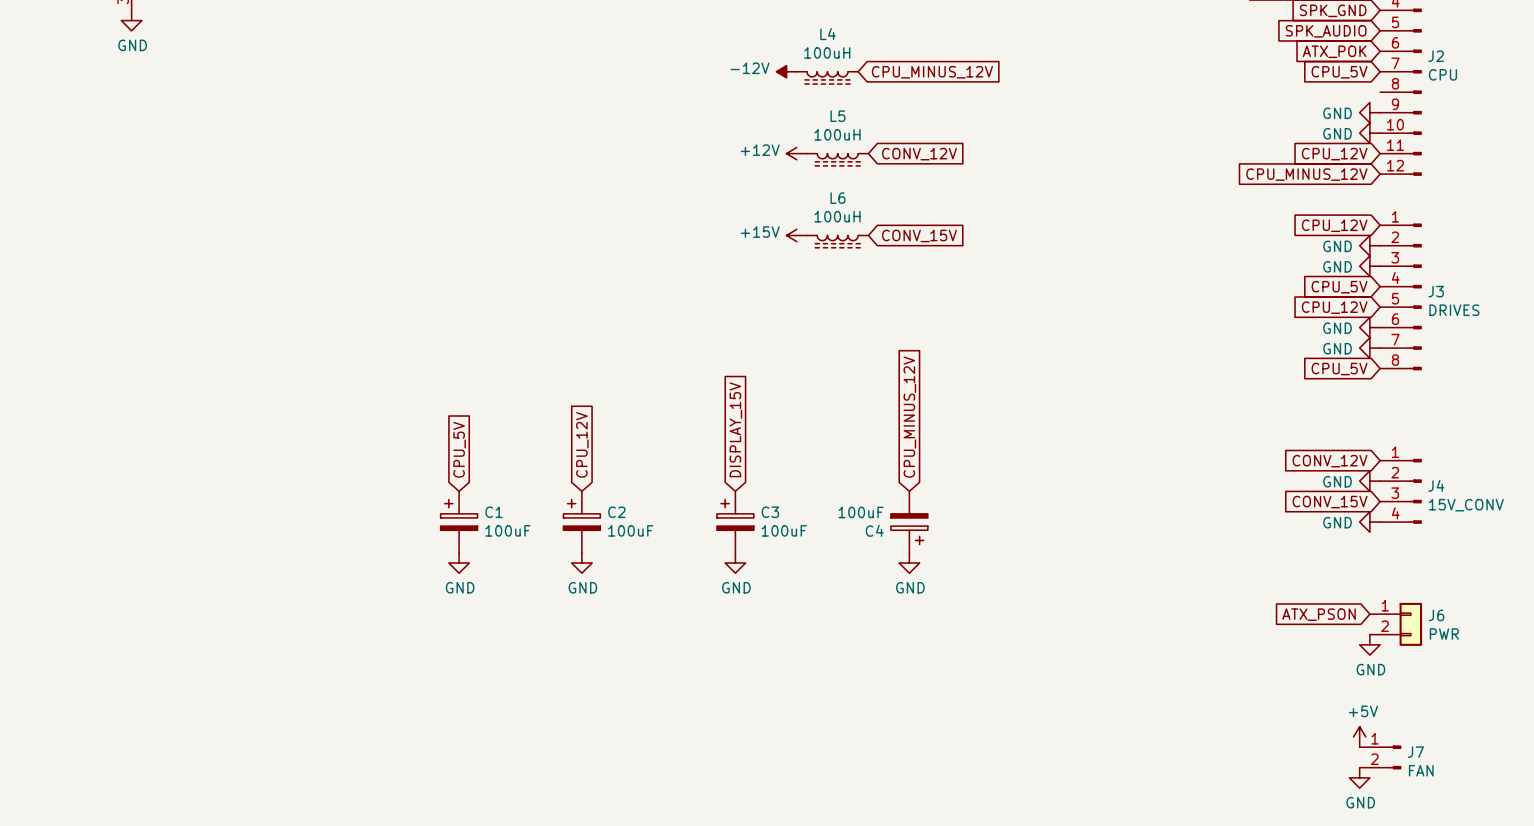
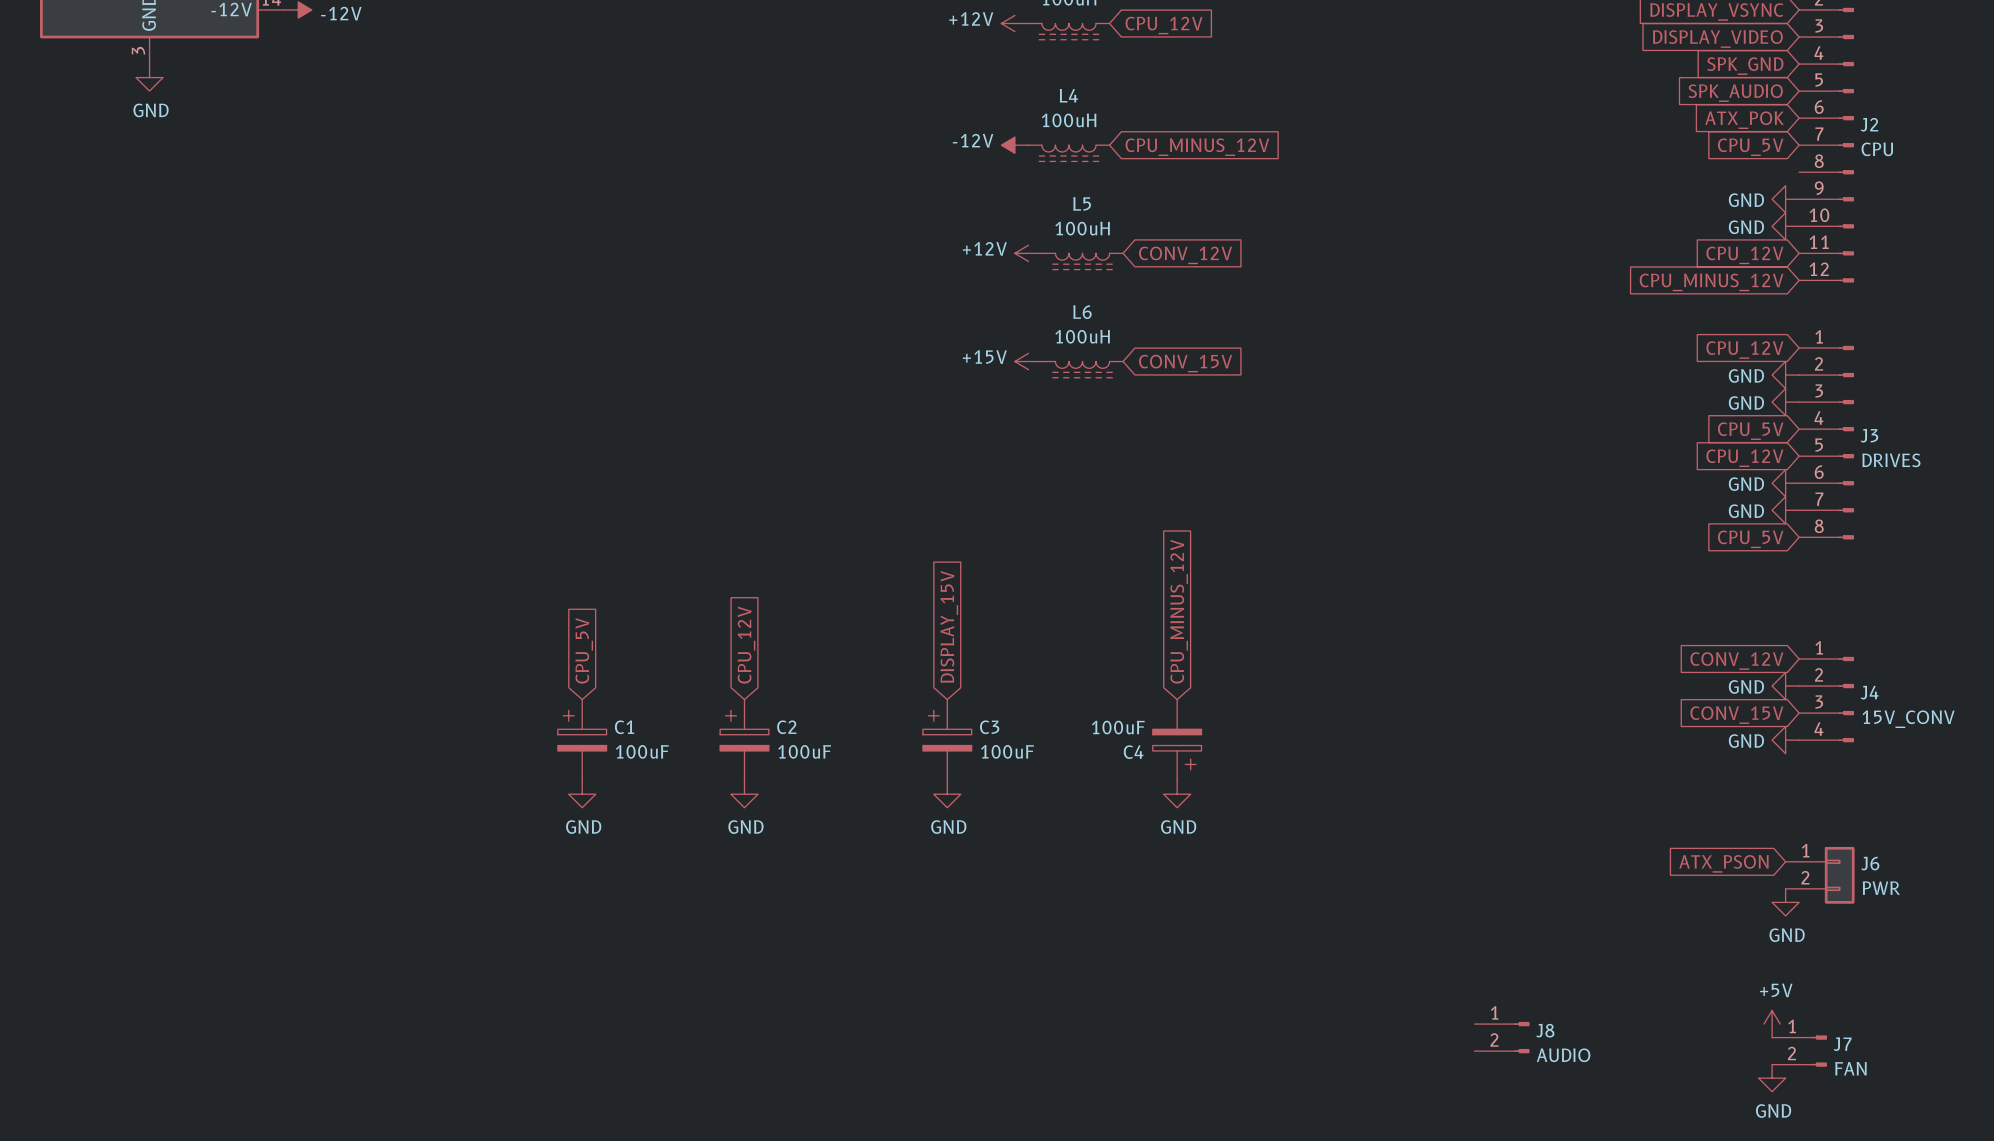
J8: none -> AUDIO (1502, 1037)

